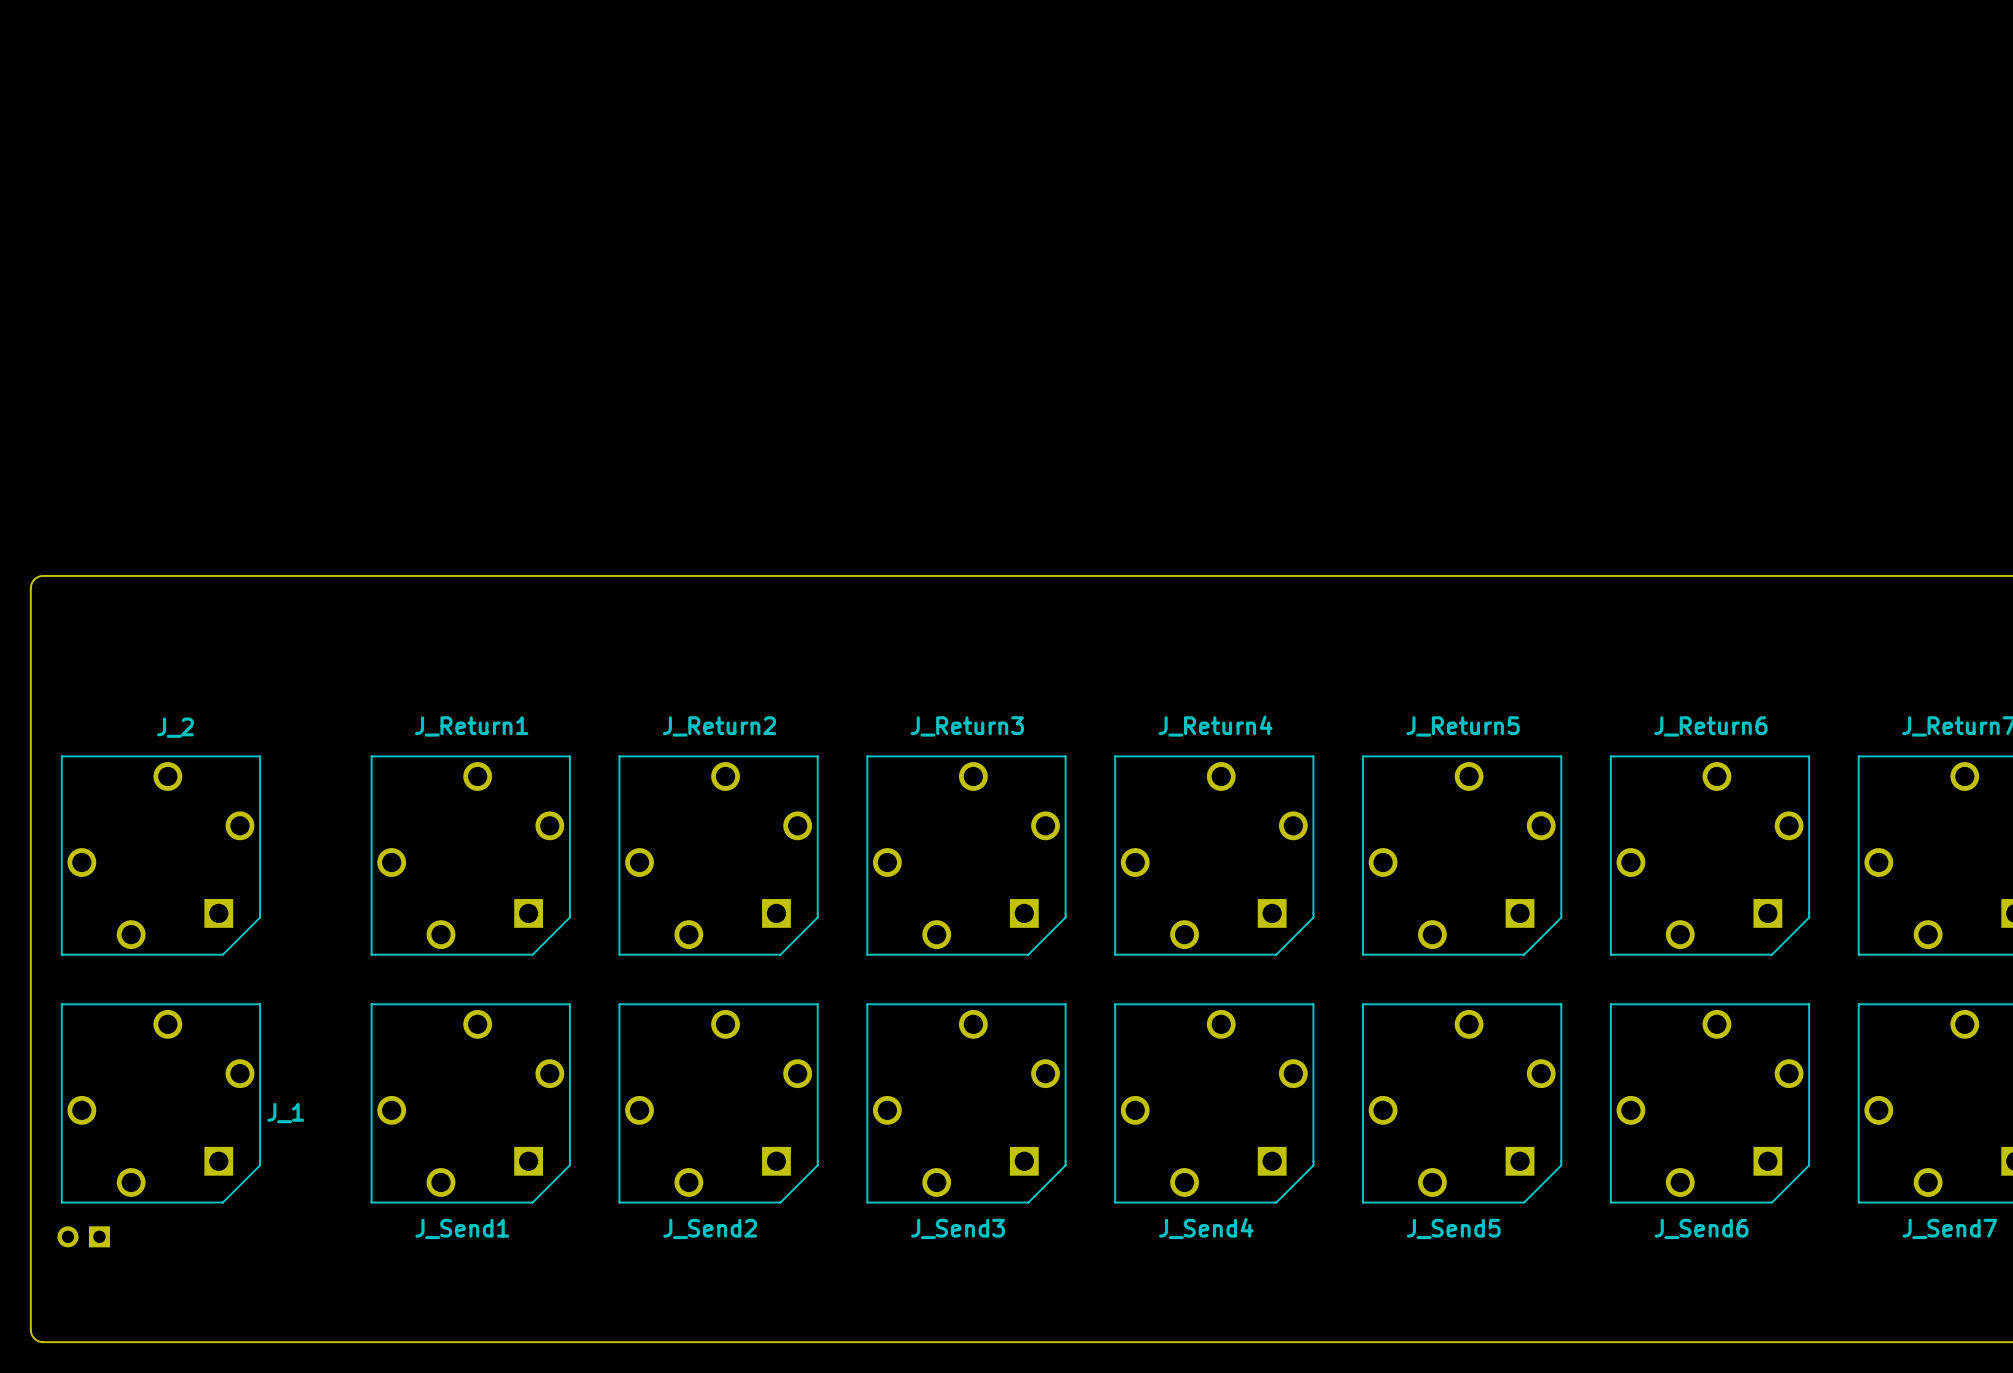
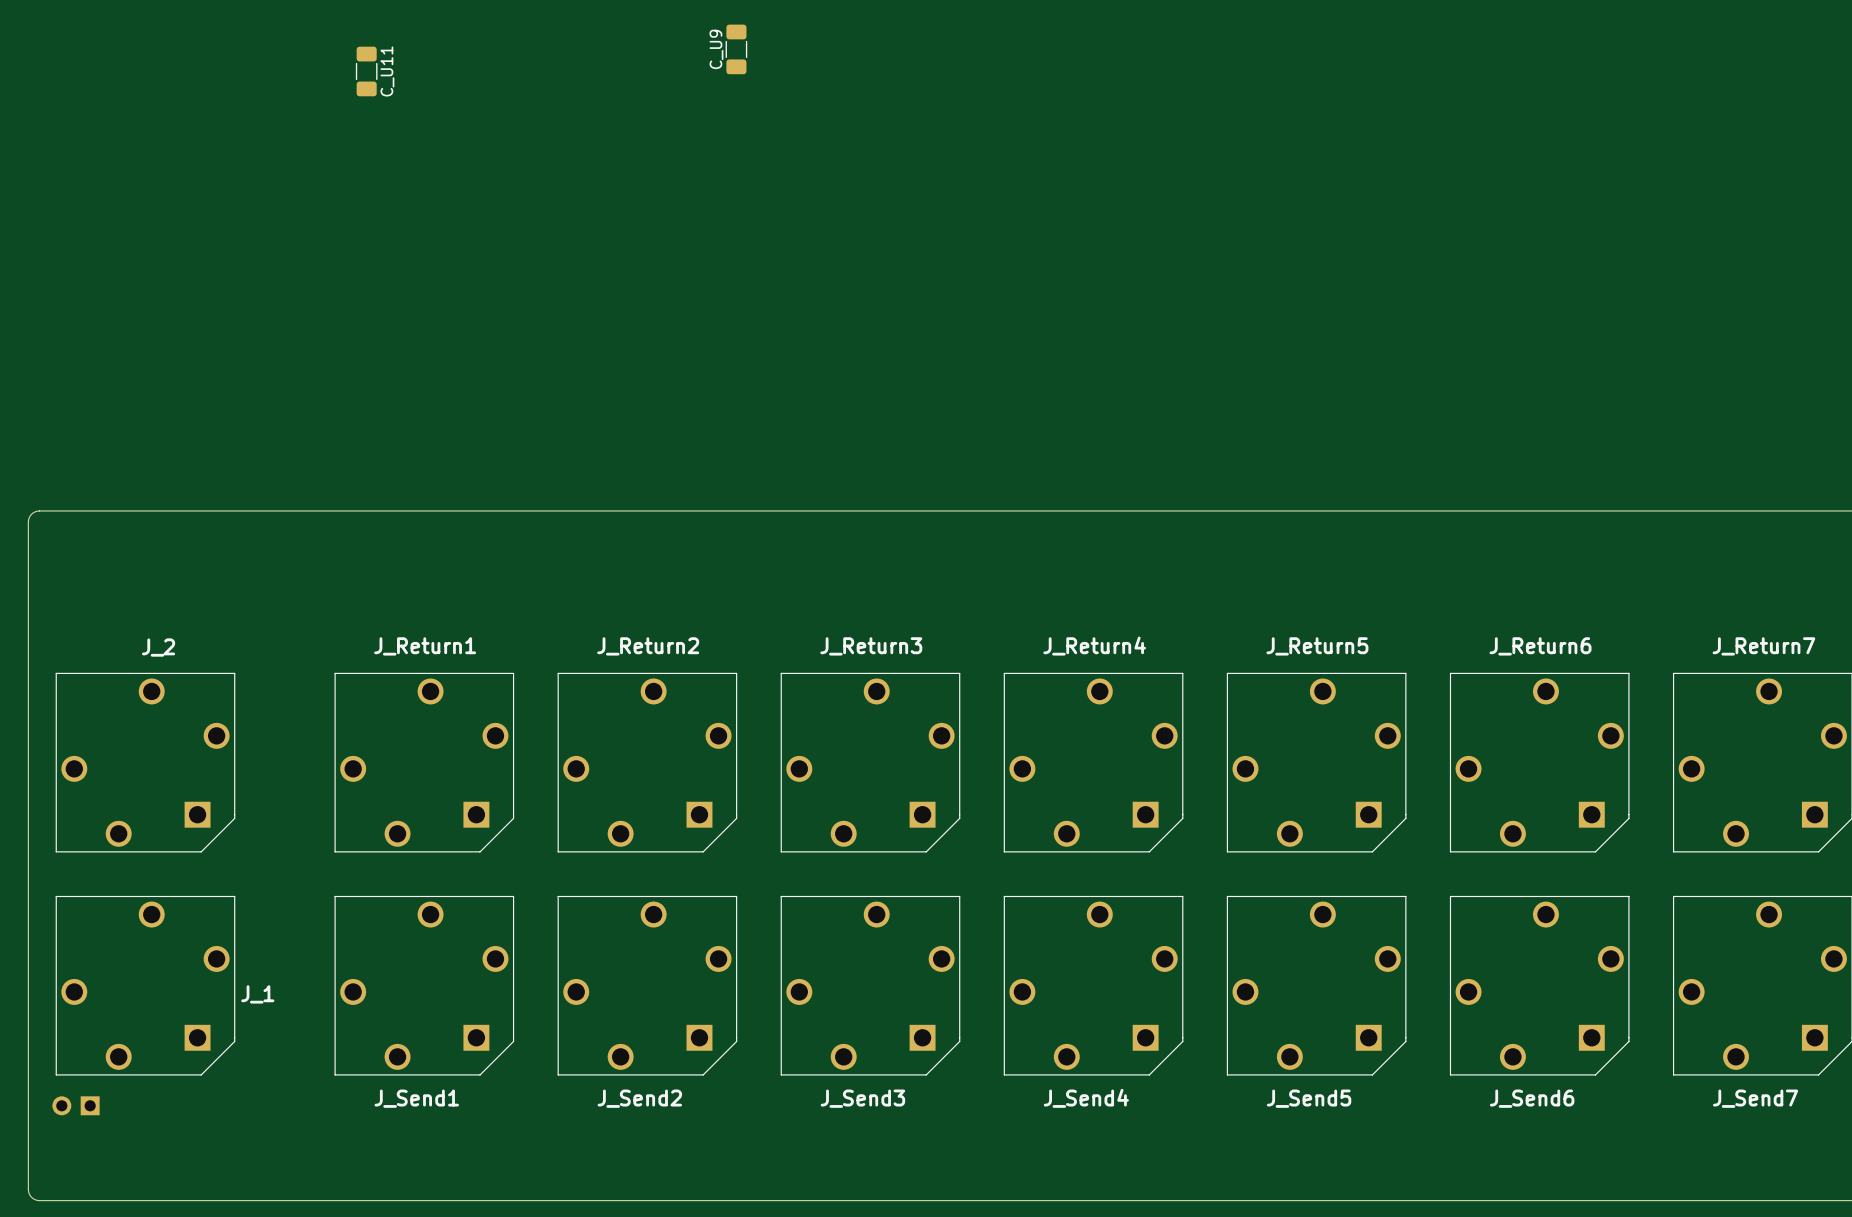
C_U9: none -> (736, 49)
C_U11: none -> (366, 71)

